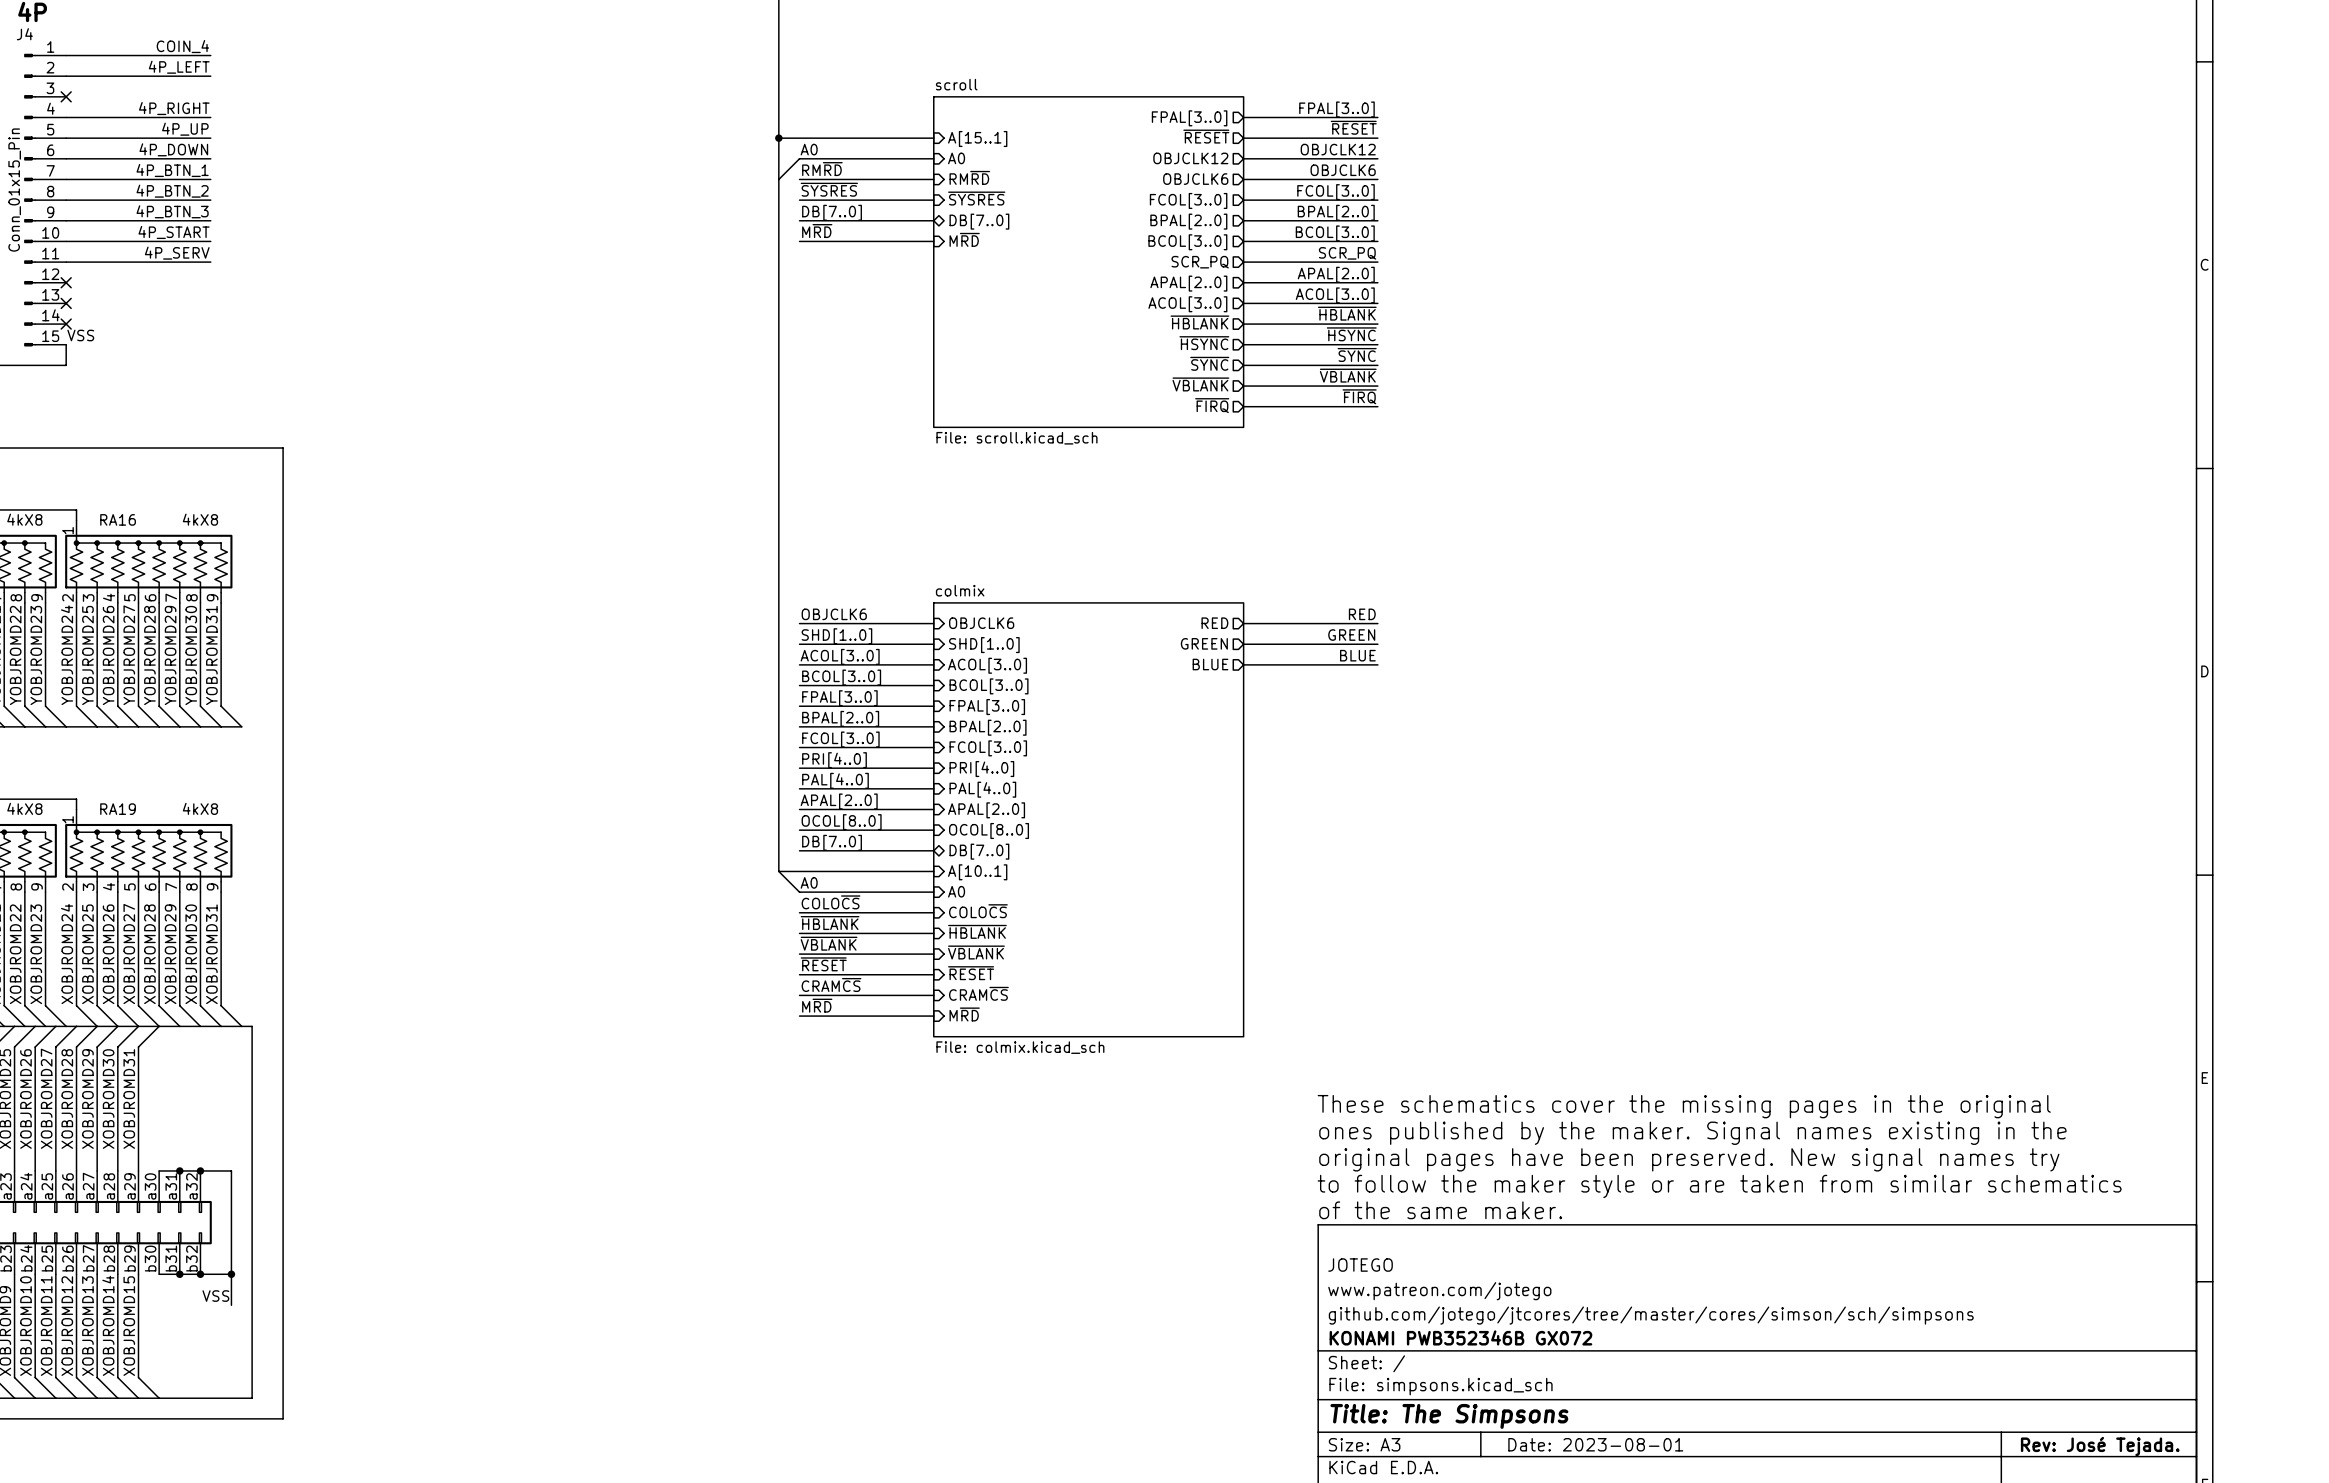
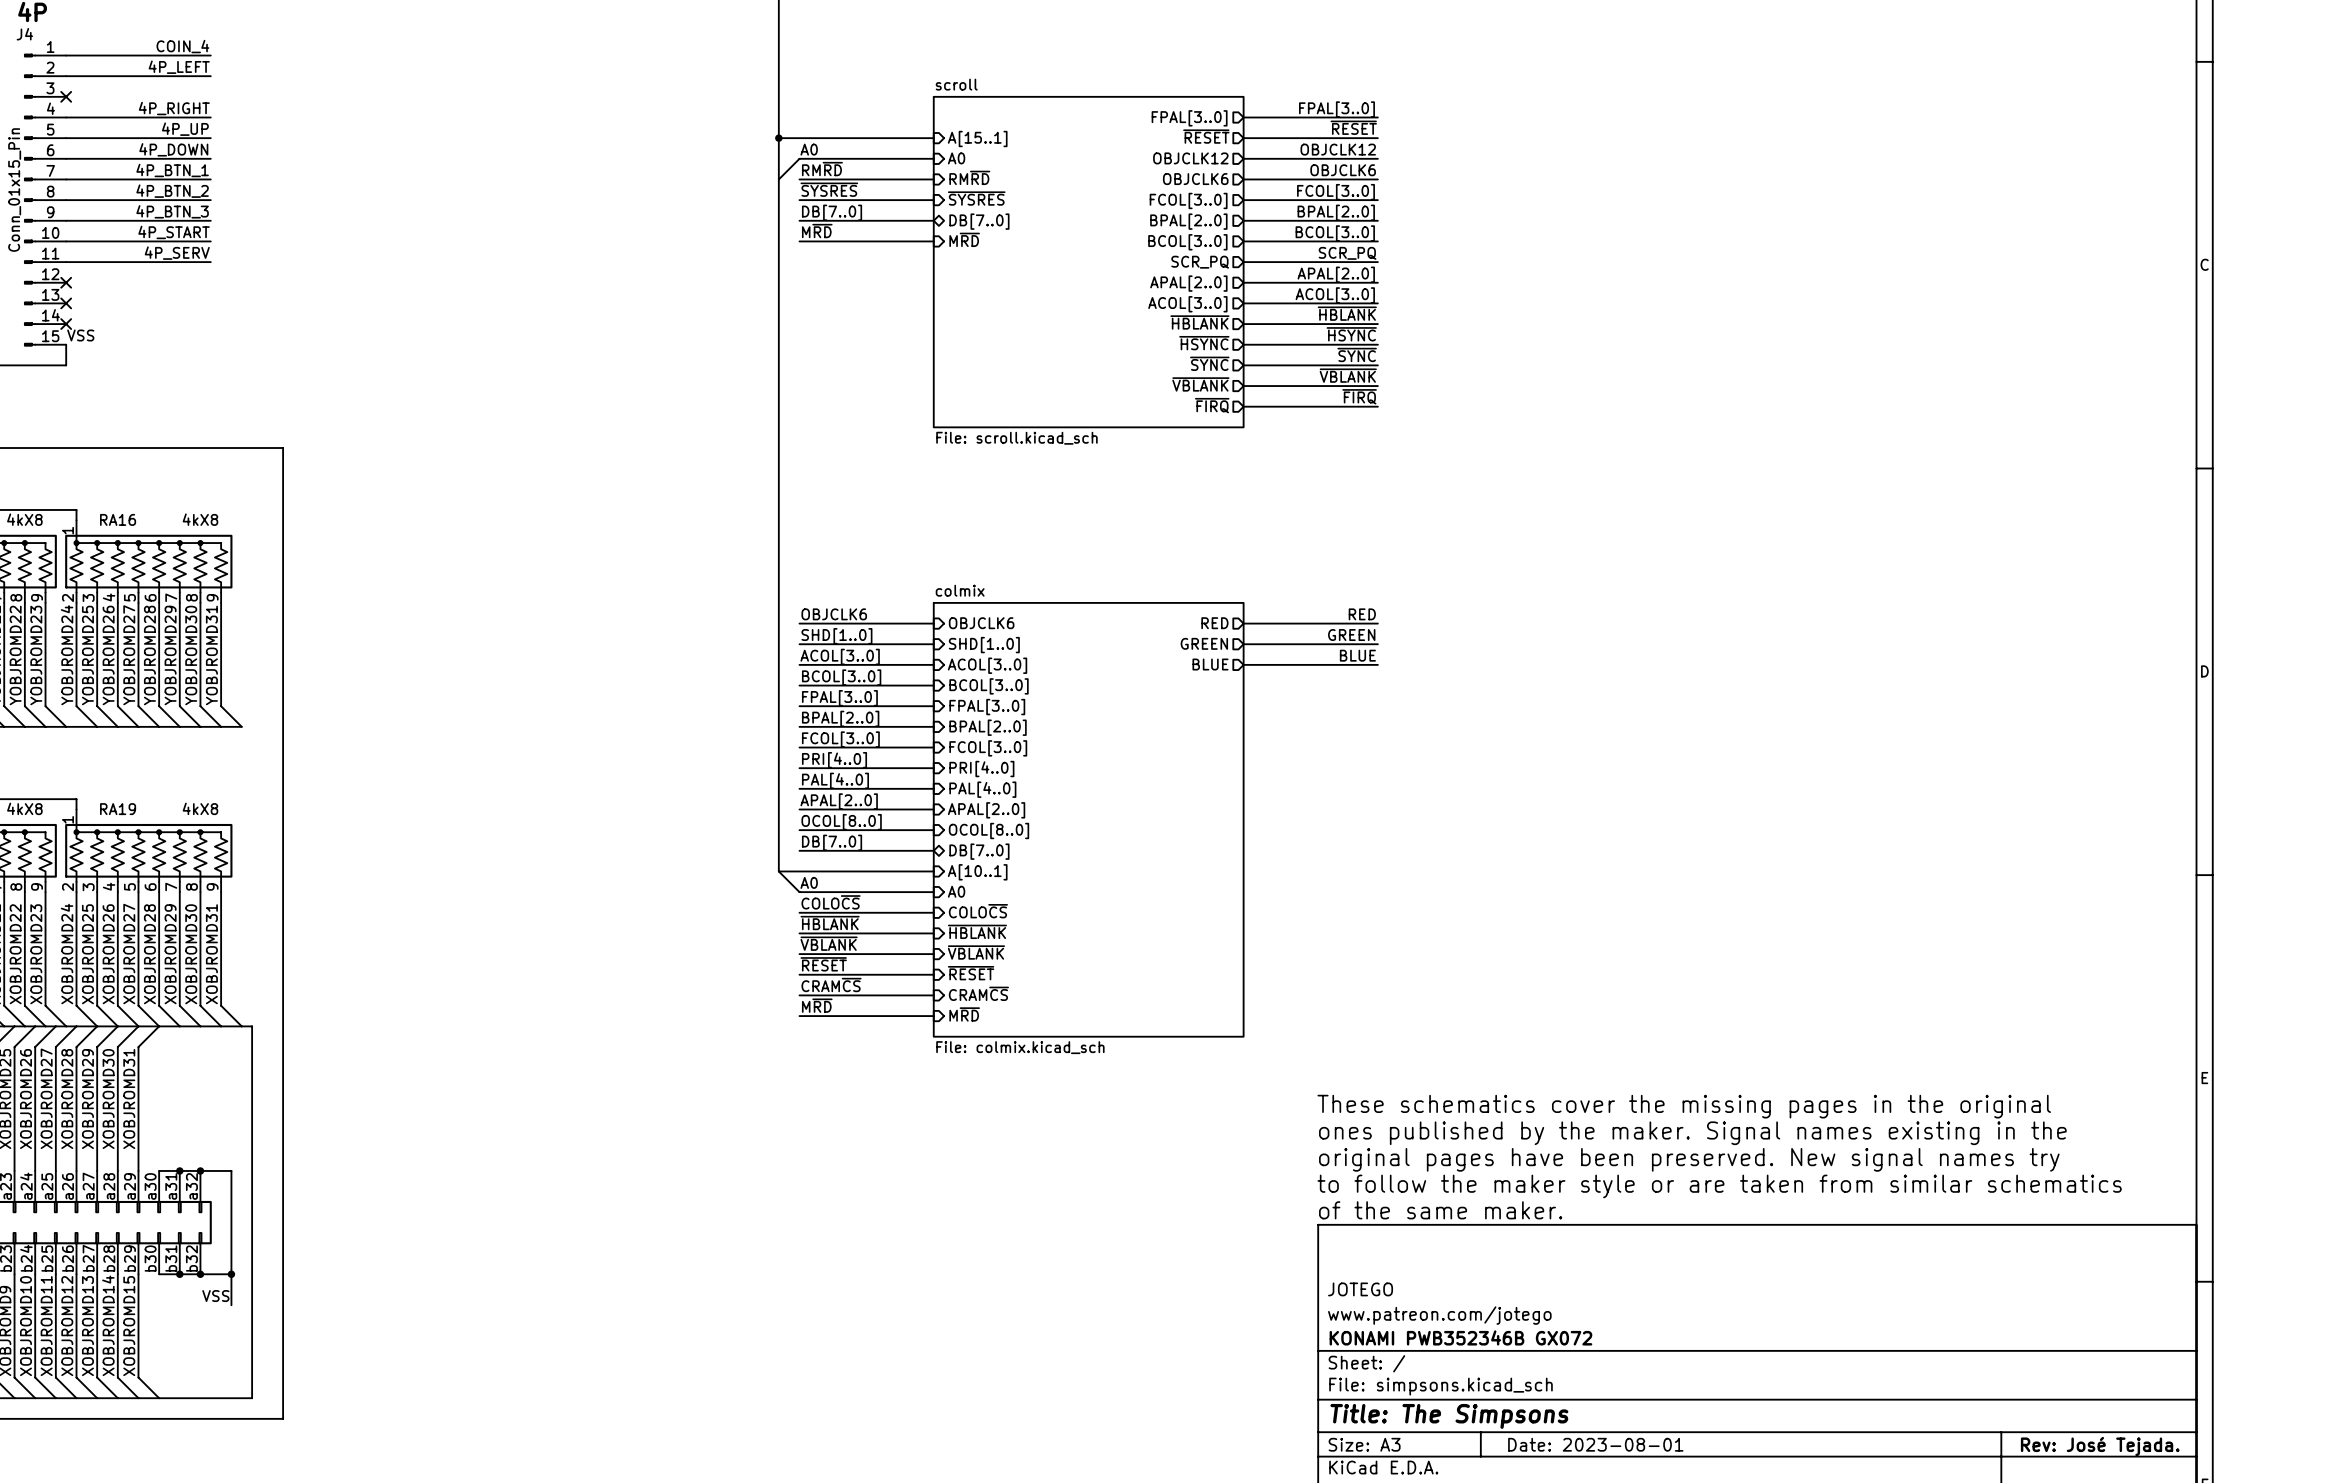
title block: JOTEGO (1360, 1265) -> none
title block: www.patreon.com/jotego (1439, 1291) -> JOTEGO (1360, 1289)
title block: github.com/jotego/jtcores/tree/master/cores/simson/sch/simpsons (1651, 1315) -> www.patreon.com/jotego (1439, 1315)

